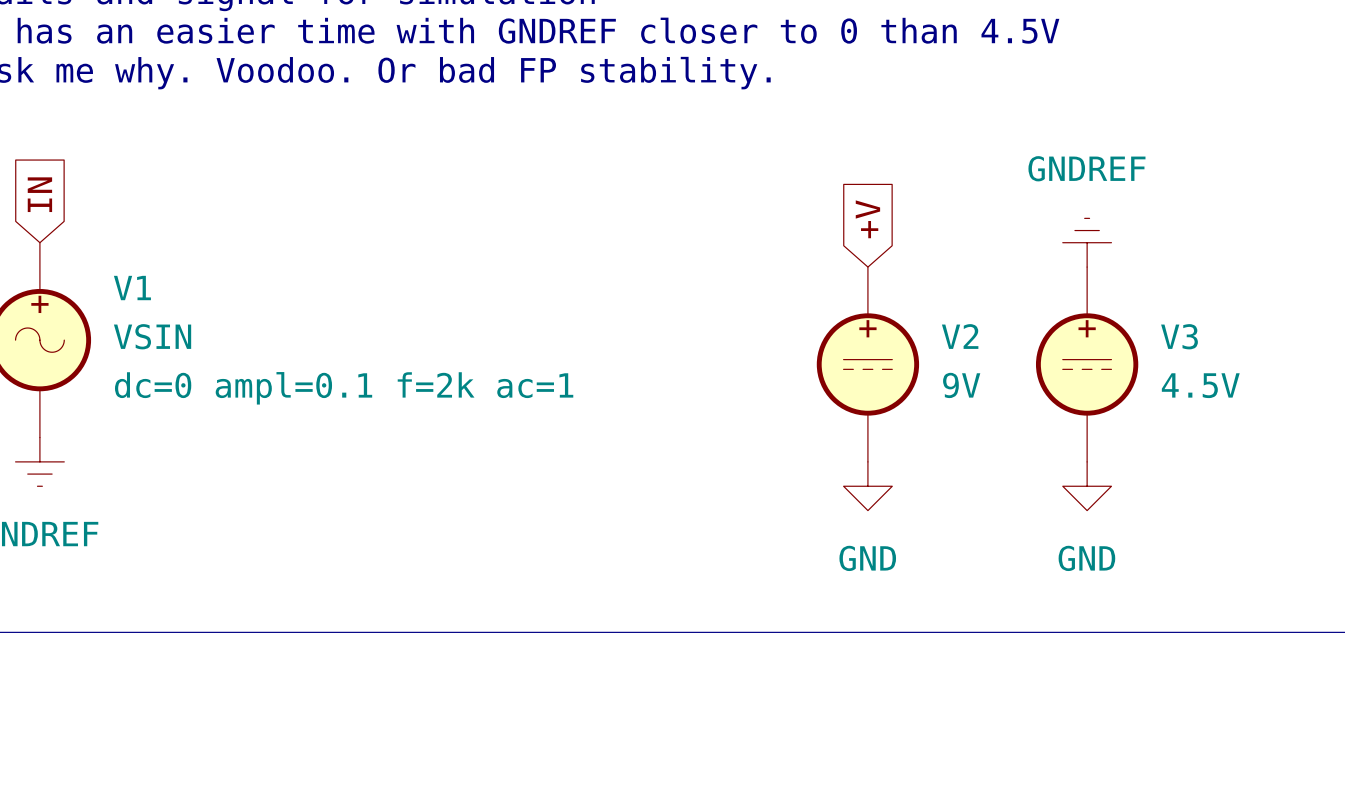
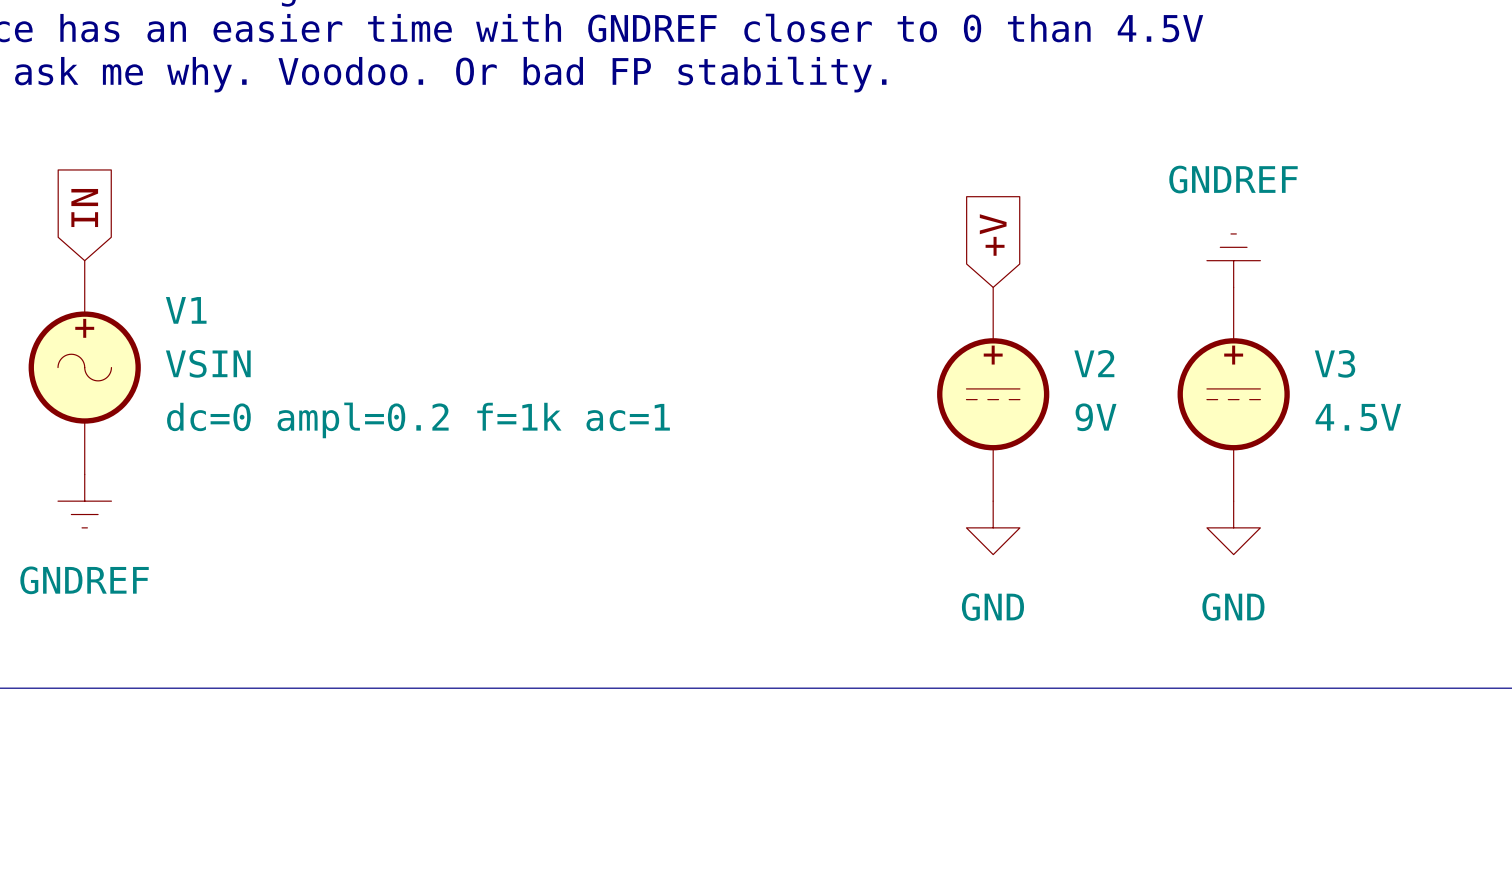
V1 text: dc=0 ampl=0.1 f=2k ac=1 (344, 388) -> dc=0 ampl=0.2 f=1k ac=1 (418, 420)

